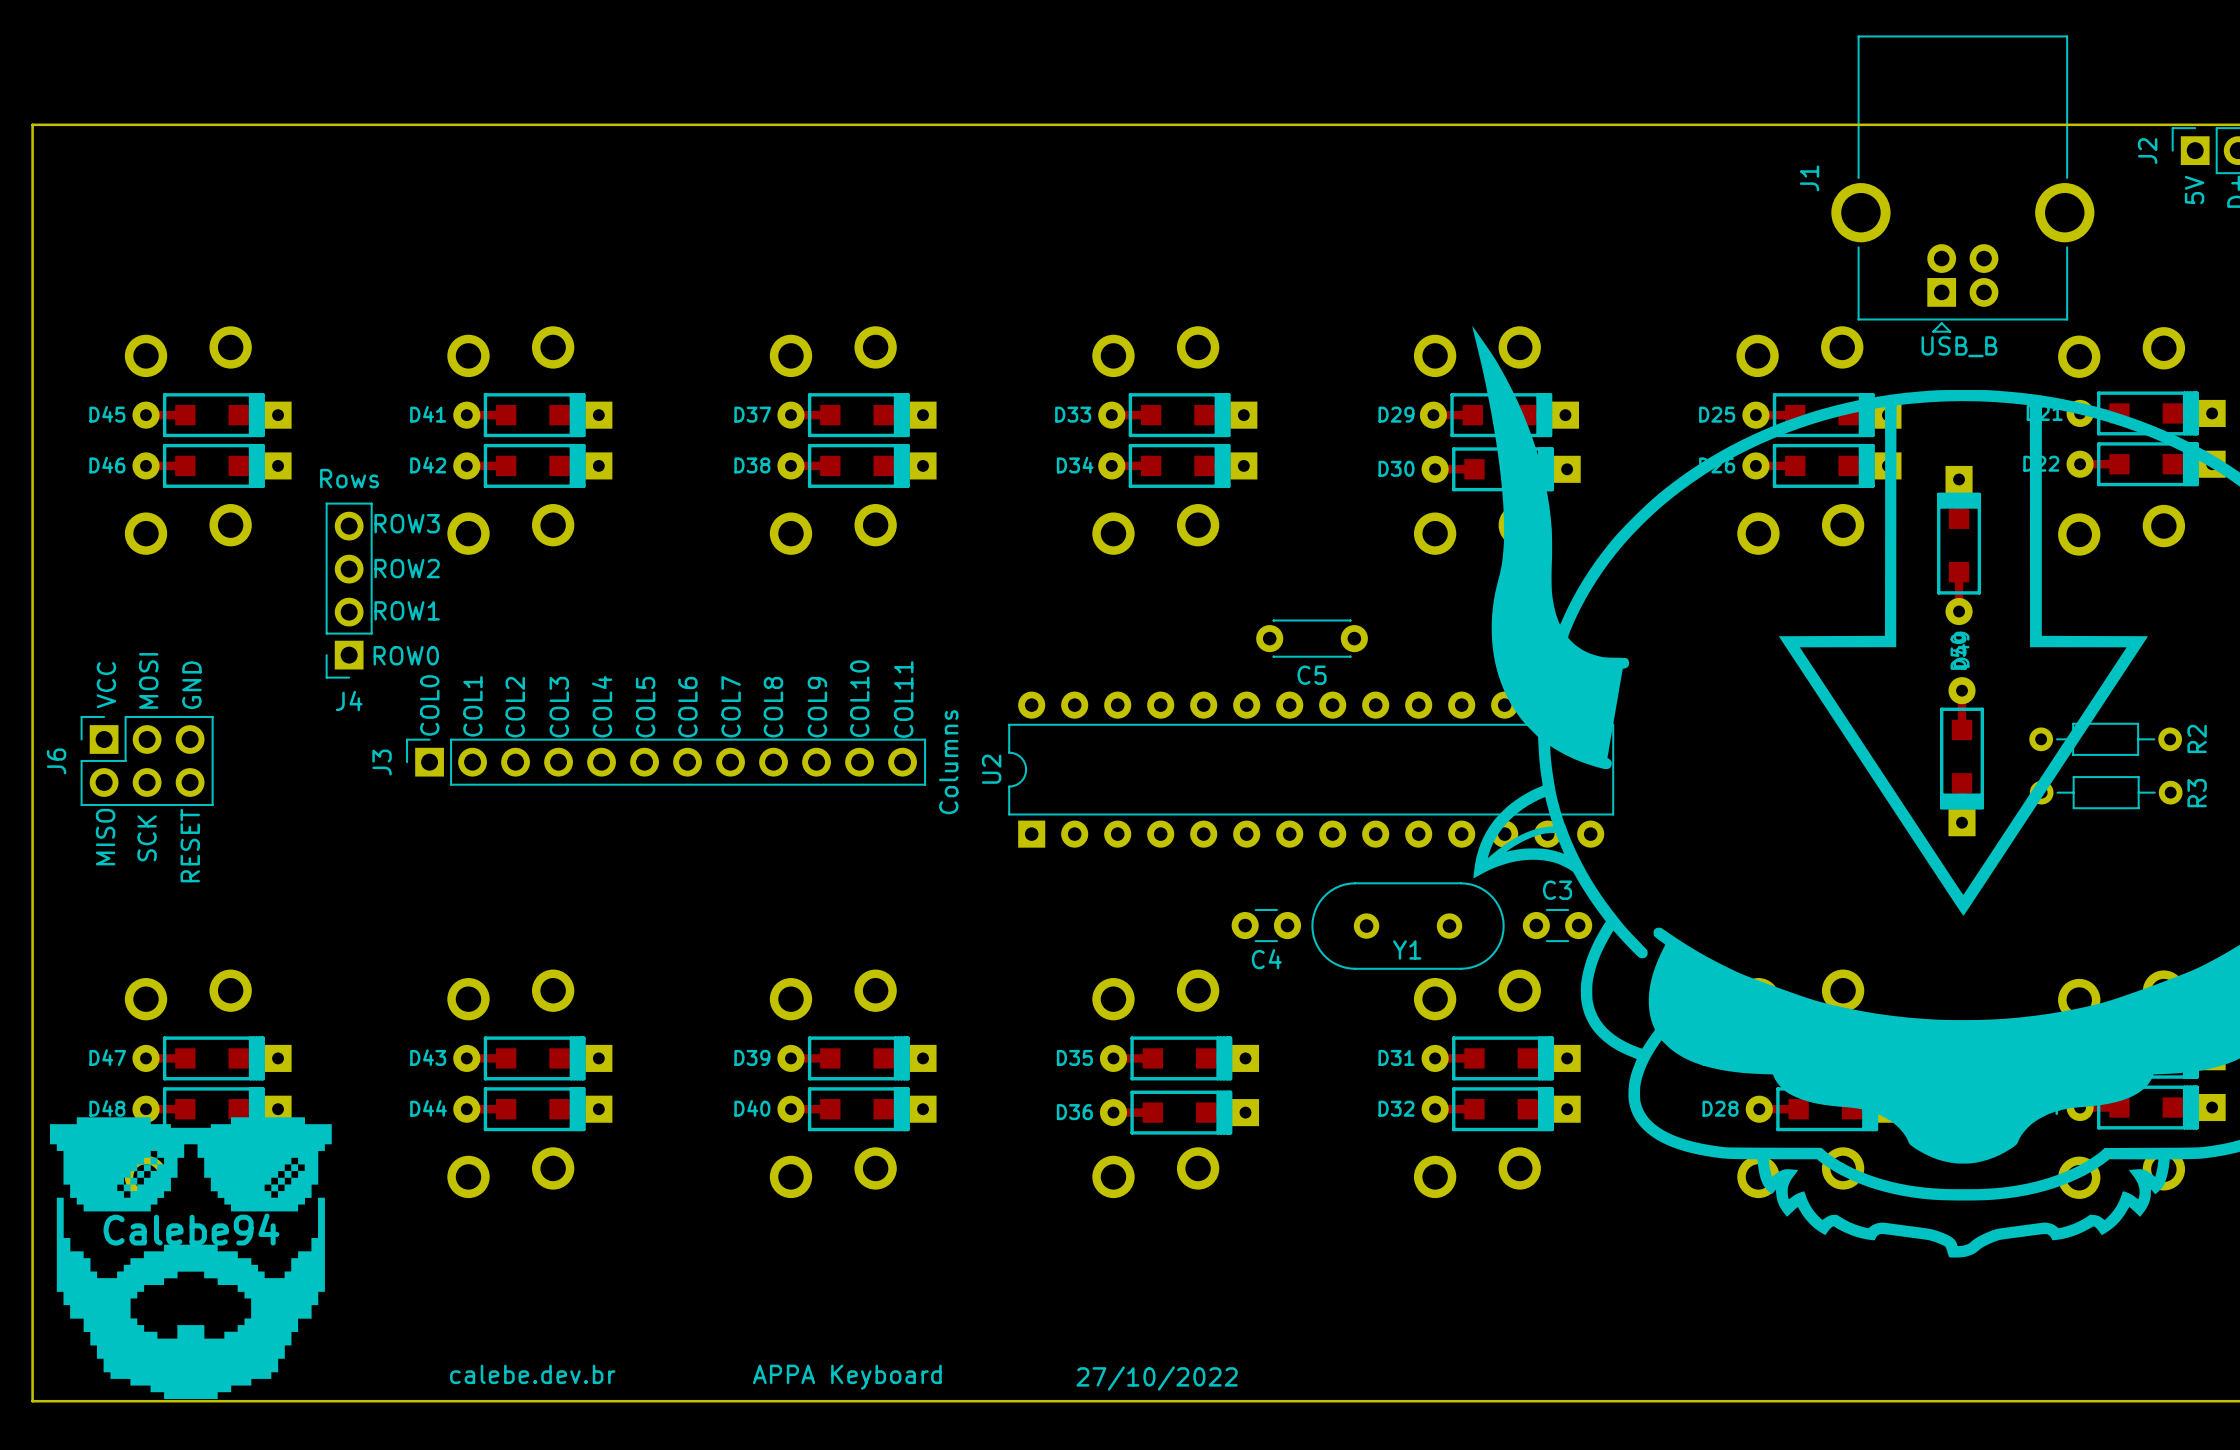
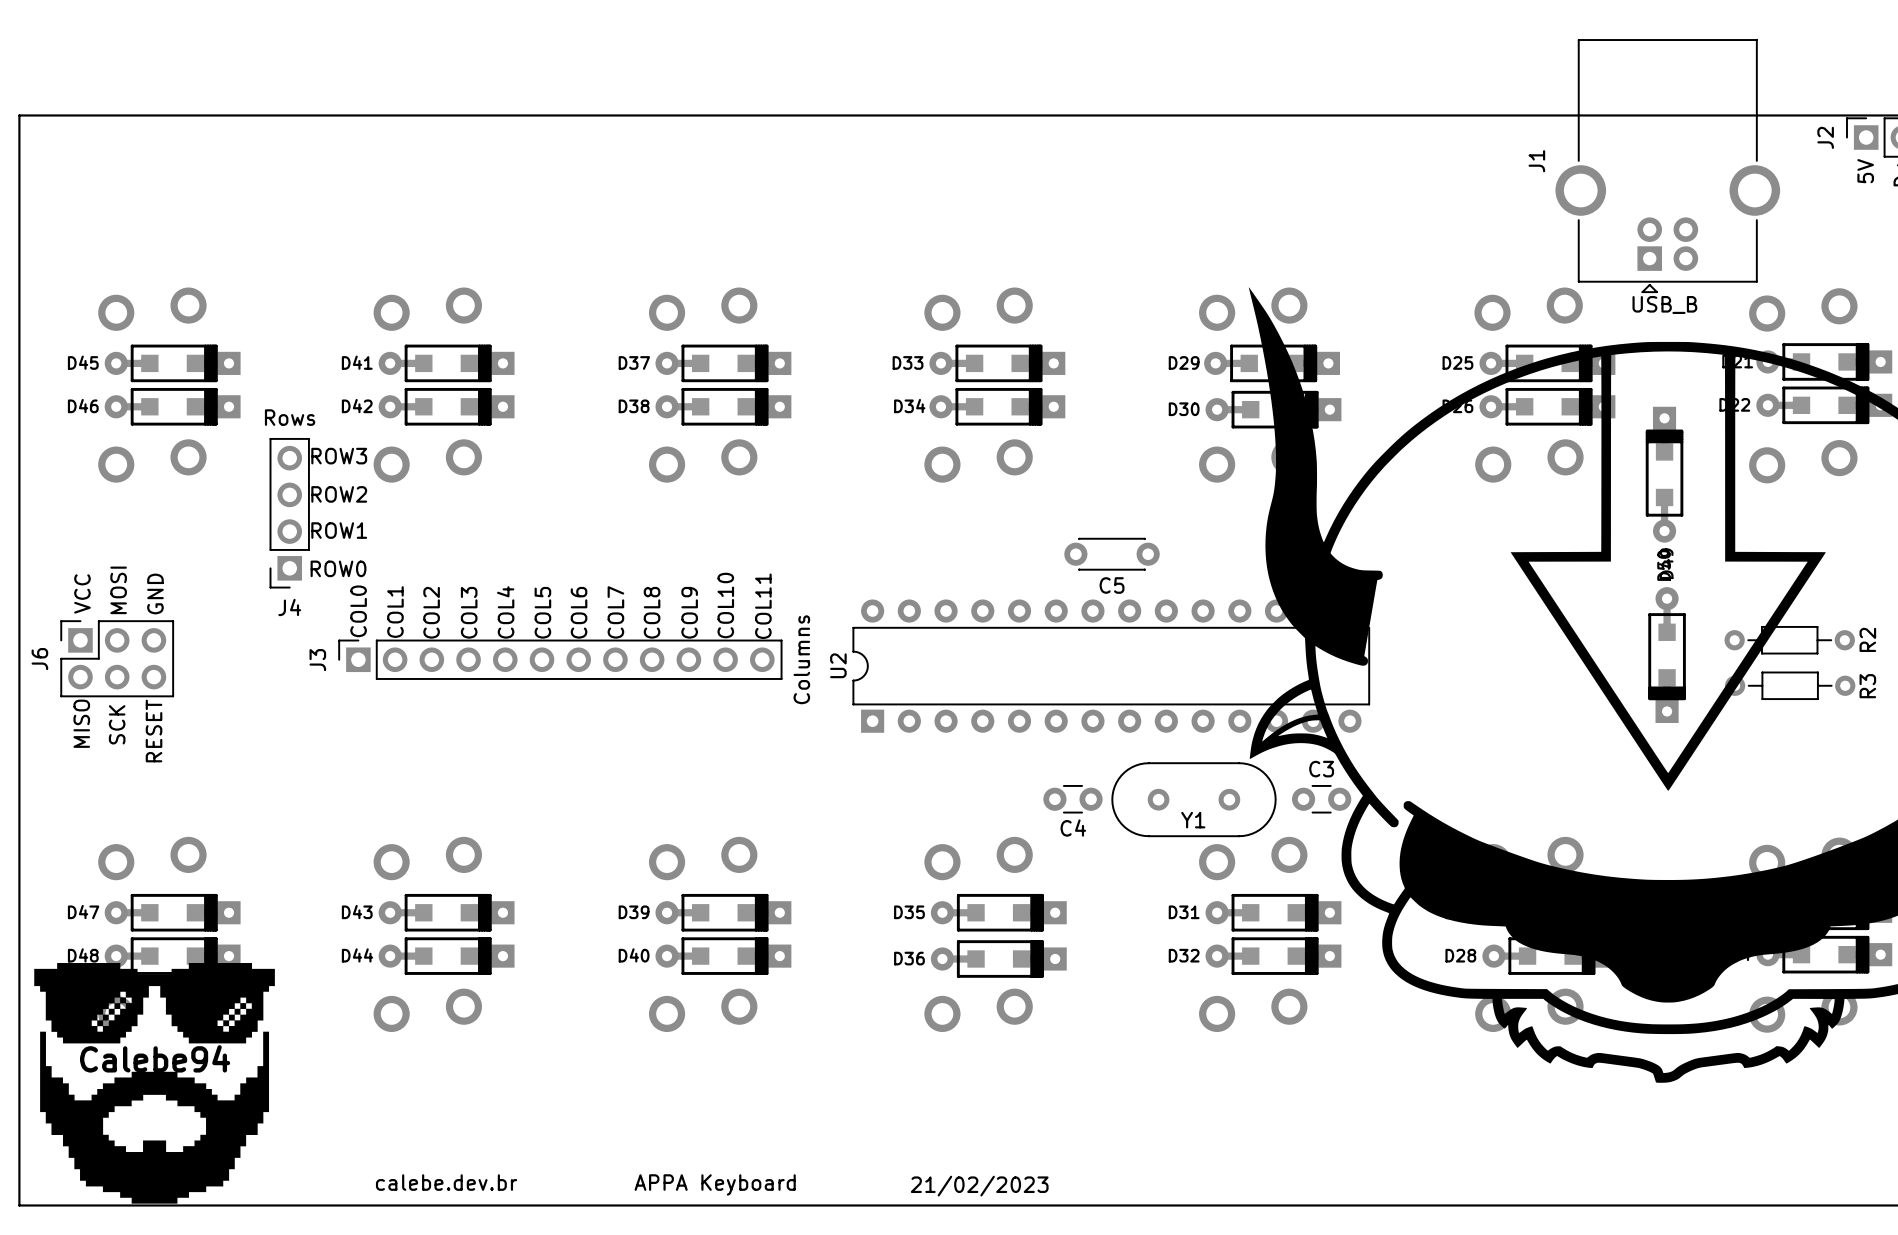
text: 27/10/2022 (1157, 1378) -> 21/02/2023 (979, 1186)

